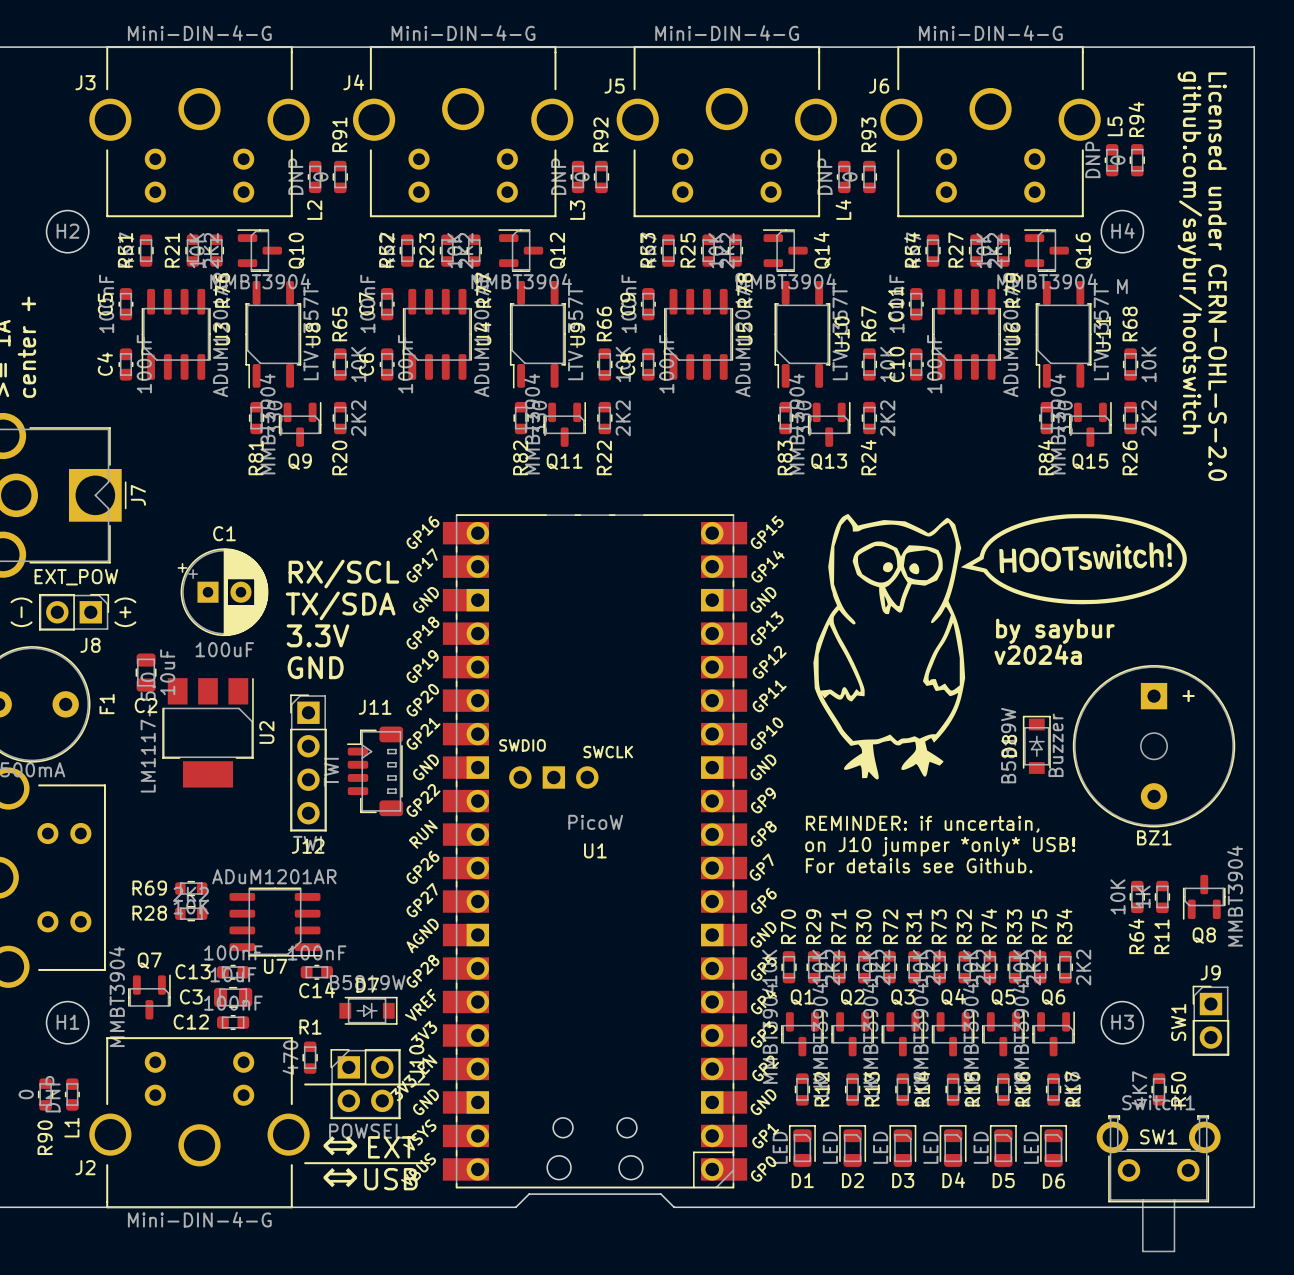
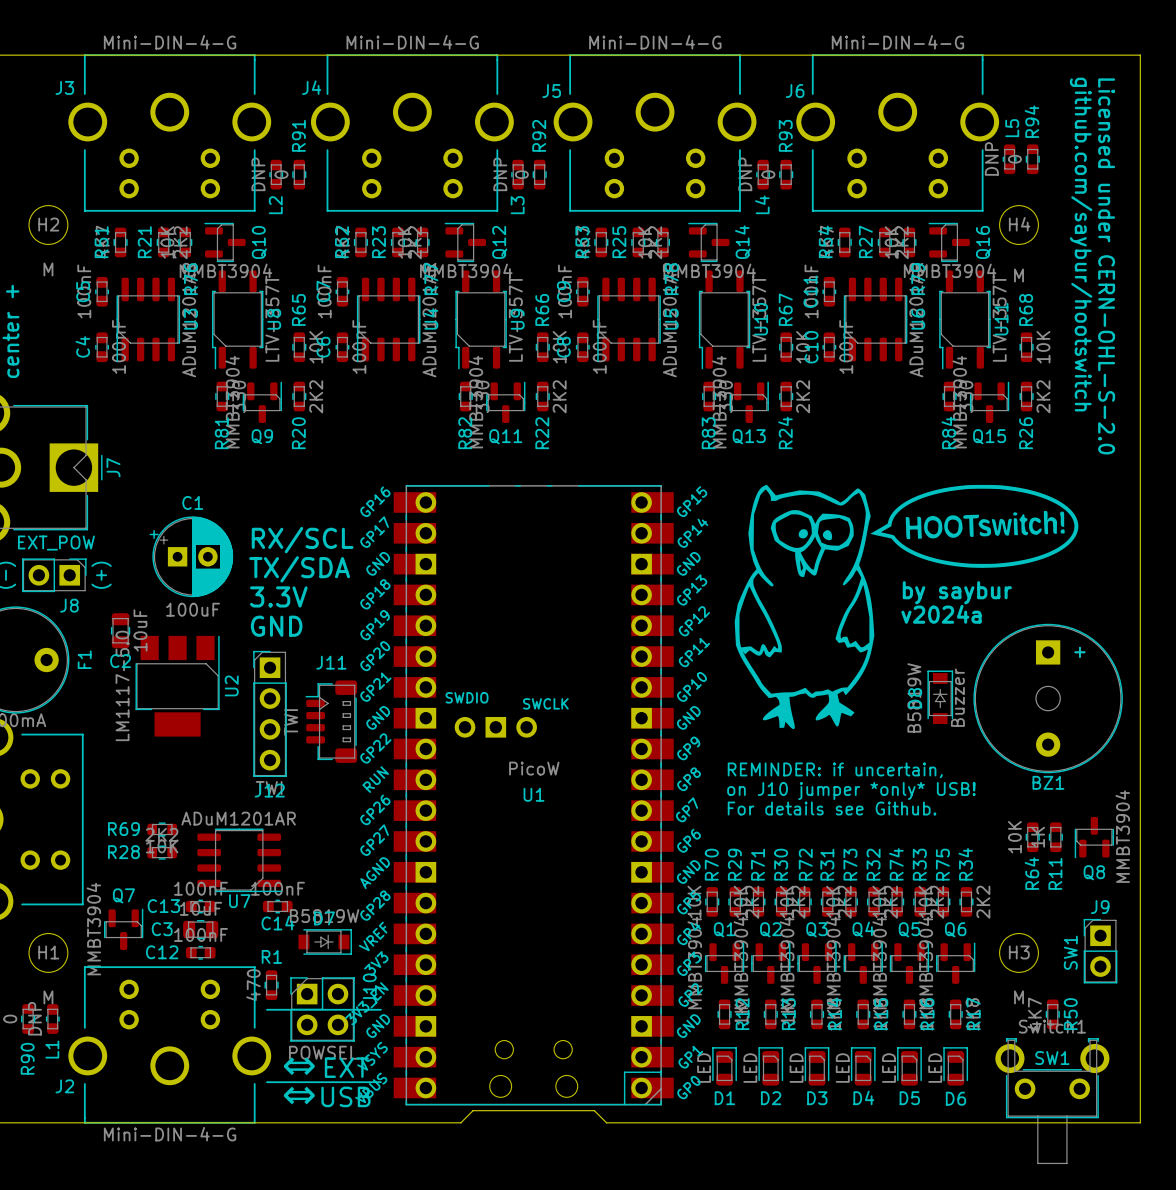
H2 value: none -> M (48, 269)
H1 value: none -> M (48, 997)
H3 value: none -> M (1019, 997)

